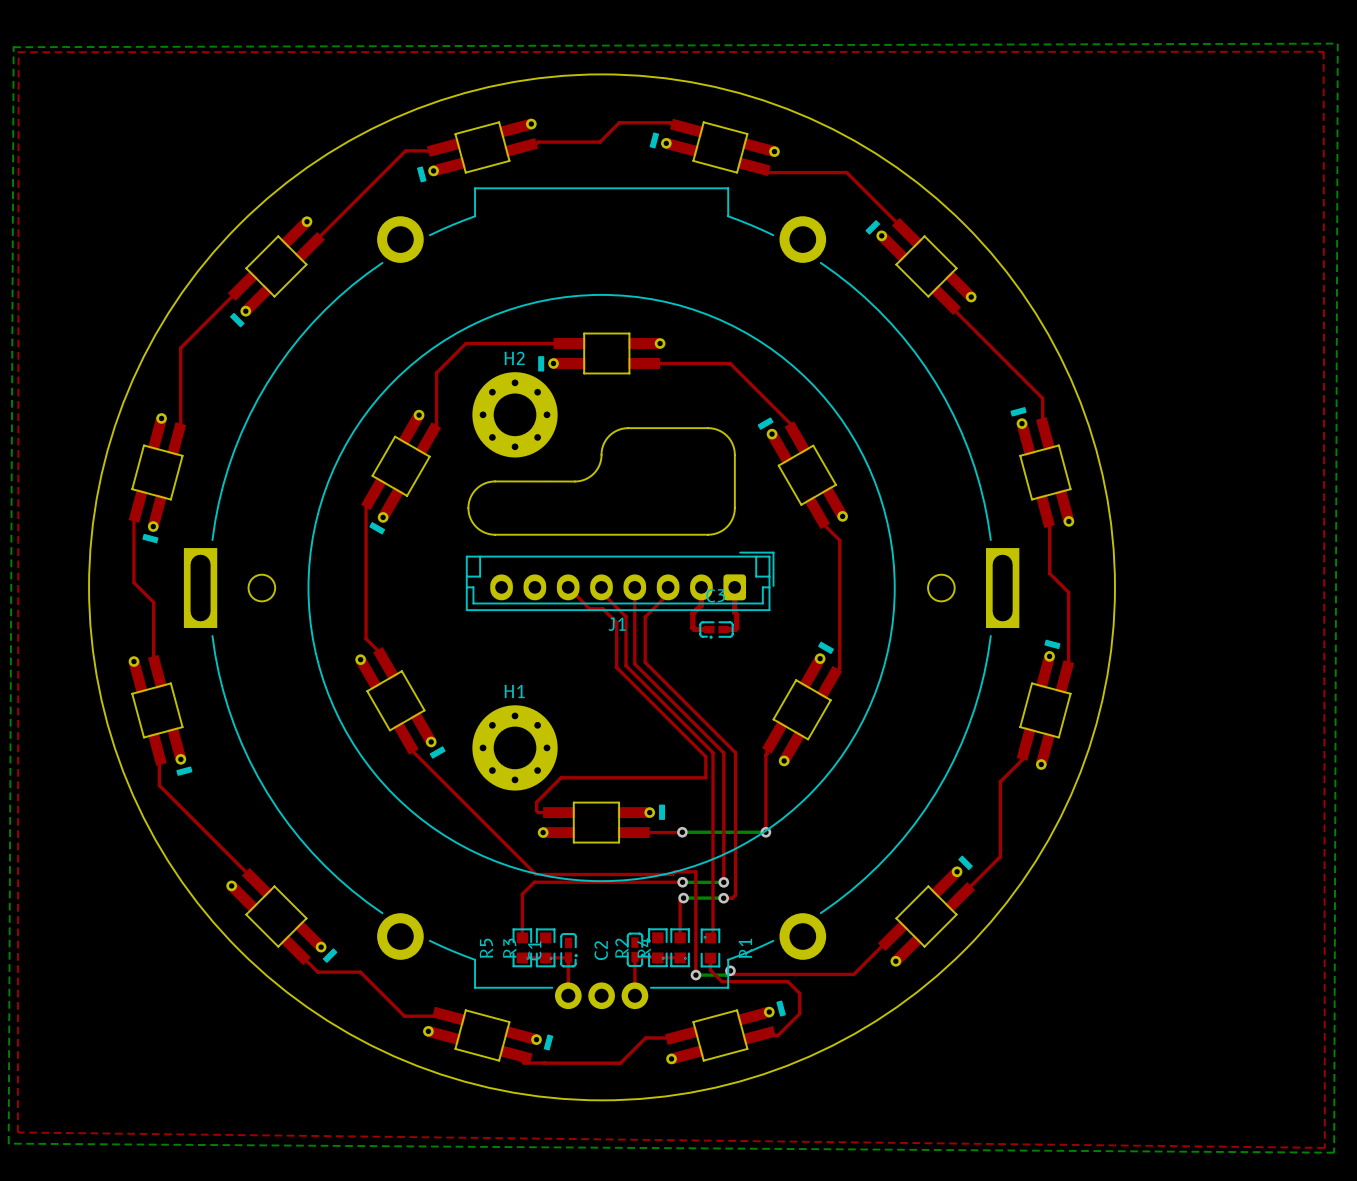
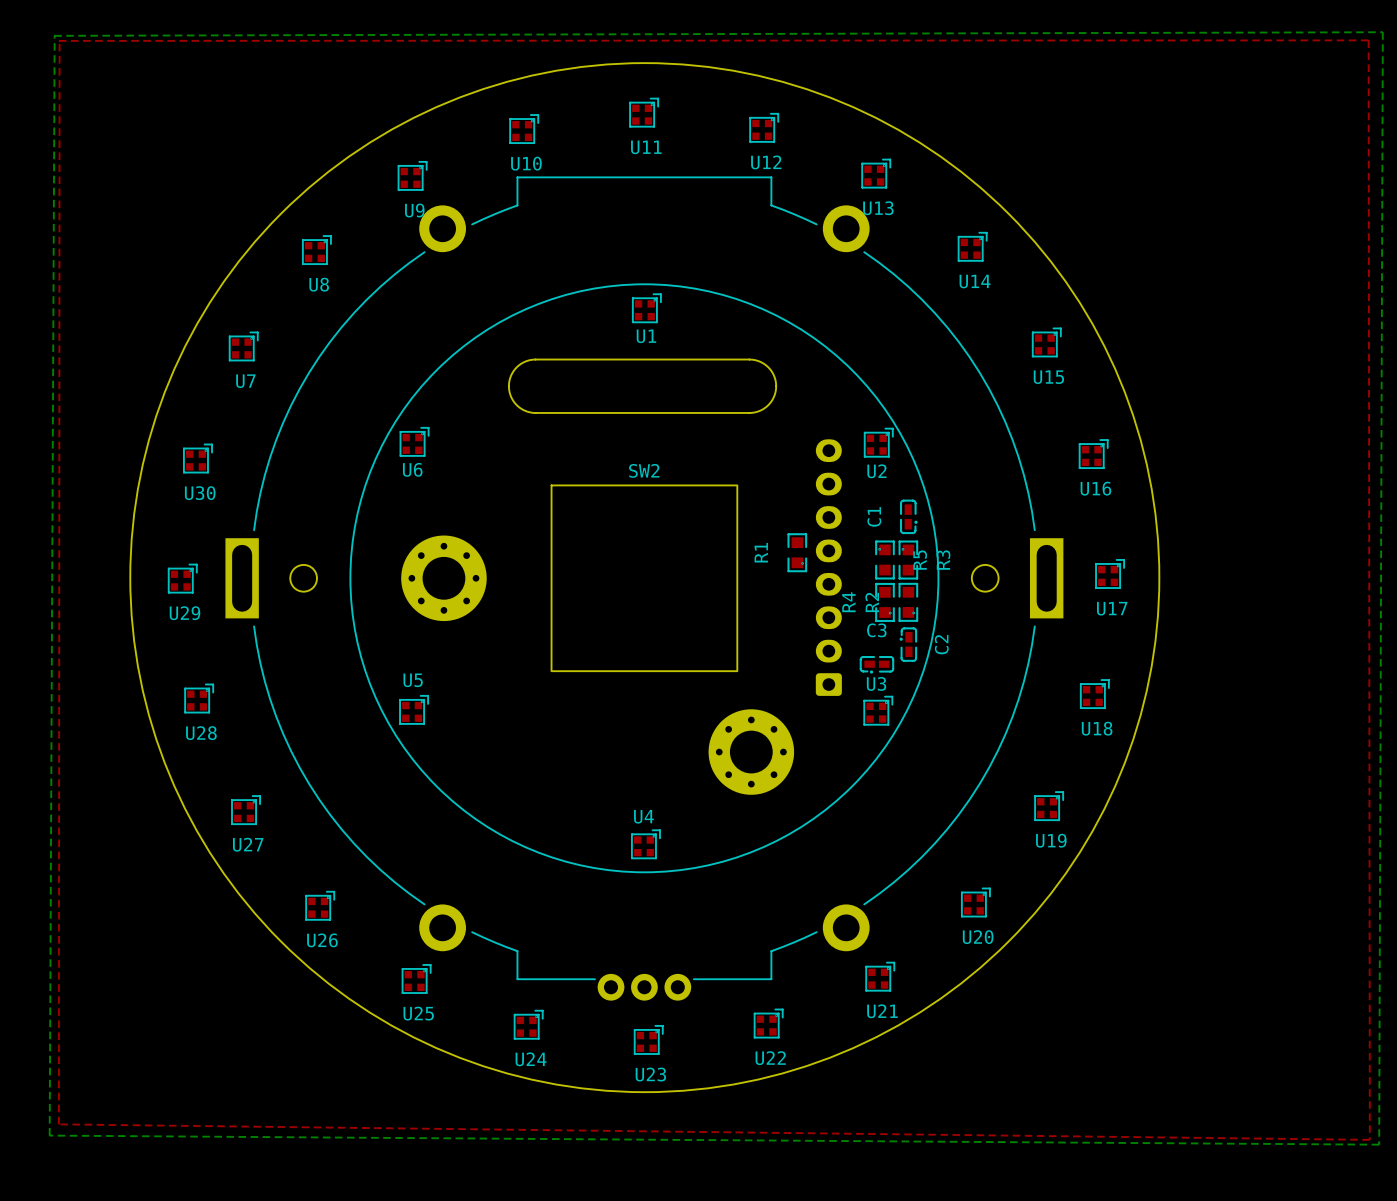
U11: none -> (644, 112)
top track: (686, 128) (675, 128) (670, 122) (619, 122) (600, 142) (538, 142) (532, 147) (521, 147) -> none
U12: none -> (764, 127)
U10: none -> (524, 129)
top track: (443, 147) (440, 150) (405, 150) (309, 247) -> none
part: (714, 147) -> none
part: (477, 150) -> none
top track: (753, 166) (763, 166) (768, 172) (846, 172) (907, 232) -> none
U13: none -> (876, 173)
U9: none -> (412, 175)
U14: none -> (972, 246)
U8: none -> (316, 250)
part: (921, 266) -> none
part: (276, 271) -> none
top track: (242, 285) (180, 347) (180, 435) (176, 439) -> none
top track: (945, 299) (1042, 398) (1042, 431) (1045, 433) -> none
U1: none -> (646, 308)
top track: (569, 343) (466, 343) (436, 372) (436, 430) (428, 438) -> none
U15: none -> (1046, 342)
part: (601, 353) -> none
U7: none -> (243, 346)
top track: (644, 363) (730, 363) (797, 430) (797, 437) -> none
board edge: none -> (535, 359) (752, 359) (761, 362) (770, 369) (774, 377) (776, 389) (768, 405) (752, 412) (532, 412) (524, 410) (514, 402) (510, 395) (509, 383) (513, 372) (518, 365) (535, 359)
H2: (515, 414) -> none
U6: none -> (414, 441)
U2: none -> (878, 442)
board edge: (601, 454) (602, 446) (607, 438) (613, 432) (622, 428) (708, 428) (719, 430) (730, 440) (734, 451) (734, 508) (732, 519) (722, 530) (711, 534) (495, 534) (480, 530) (471, 519) (468, 511) (469, 499) (474, 491) (483, 484) (495, 481) (580, 480) (595, 471) (601, 454) -> none
U16: none -> (1093, 454)
part: (1042, 467) -> none
U30: none -> (197, 458)
part: (401, 472) -> none
part: (802, 473) -> none
part: (157, 478) -> none
top track: (373, 493) (366, 501) (366, 638) (385, 658) (385, 663) -> none
top track: (138, 505) (133, 510) (133, 582) (153, 602) (153, 668) (157, 671) -> none
top track: (1045, 511) (1045, 522) (1049, 526) (1049, 573) (1068, 592) (1068, 673) (1064, 677) -> none
top track: (817, 512) (817, 517) (839, 540) (839, 668) (829, 678) (829, 682) -> none
J1 side: top (620, 581) -> bottom (828, 567)
U17: none -> (1110, 573)
top track: (568, 587) (589, 608) (602, 608) (616, 622) (616, 667) (705, 756) (705, 777) (561, 777) (536, 802) (538, 812) (559, 812) -> none
top track: (601, 587) (601, 592) (626, 616) (626, 665) (713, 752) (713, 935) (710, 937) -> none
top track: (634, 587) (634, 663) (723, 752) (723, 882) -> none
top track: (668, 587) (668, 594) (645, 617) (645, 662) (735, 752) (735, 895) (732, 898) (723, 898) -> none
top track: (701, 587) (701, 604) (692, 613) (692, 627) (694, 629) (709, 629) -> none
top track: (734, 587) (736, 627) (734, 629) (723, 629) -> none
U29: none -> (182, 578)
part: none -> (443, 578)
SW2: none -> (644, 578)
C3 position: (716, 630) -> (876, 664)
part: (400, 702) -> none
part: (802, 703) -> none
U18: none -> (1094, 694)
part: (1045, 704) -> none
U28: none -> (199, 698)
part: (160, 715) -> none
U5: none -> (414, 709)
U3: none -> (878, 710)
top track: (774, 737) (766, 744) (765, 755) (765, 832) -> none
top track: (405, 738) (405, 744) (535, 874) (672, 874) (675, 871) (695, 871) (695, 974) -> none
top track: (1026, 743) (1026, 756) (1000, 781) (1000, 856) (959, 897) -> none
H1: (515, 747) -> none
top track: (157, 749) (159, 751) (159, 785) (256, 883) -> none
part: none -> (751, 752)
U19: none -> (1049, 806)
U27: none -> (246, 810)
part: (601, 822) -> none
top track: (682, 832) (633, 832) -> none
bottom track: (682, 832) (765, 832) -> none
via: (682, 832) -> none
via: (765, 832) -> none
U4: none -> (645, 844)
top track: (682, 882) (534, 882) (522, 894) (522, 937) -> none
bottom track: (682, 882) (723, 882) -> none
via: (682, 882) -> none
via: (723, 882) -> none
top track: (683, 898) (680, 901) (680, 937) -> none
bottom track: (683, 898) (723, 898) -> none
via: (683, 898) -> none
via: (723, 898) -> none
part: (926, 911) -> none
U20: none -> (975, 902)
U26: none -> (320, 905)
part: (281, 916) -> none
top track: (893, 935) (853, 974) (734, 974) (730, 970) -> none
R5 rotation: 0° (522, 947) -> 180° (884, 559)
R5 position: (522, 947) -> (884, 559)
R3 rotation: 0° (545, 947) -> 180° (908, 560)
R3 position: (545, 947) -> (908, 560)
R2 position: (657, 947) -> (908, 602)
R4 position: (680, 947) -> (884, 602)
R1 rotation: 0° (710, 948) -> 180° (797, 552)
R1 position: (710, 948) -> (797, 552)
top track: (295, 949) (317, 972) (360, 972) (404, 1016) (449, 1016) -> none
C2 rotation: 0° (635, 949) -> 180° (908, 644)
C2 position: (635, 949) -> (908, 644)
C1 position: (569, 950) -> (908, 516)
top track: (568, 957) (568, 995) -> none
top track: (680, 957) (634, 957) (634, 995) -> none
top track: (710, 958) (710, 970) (721, 981) (787, 981) (799, 993) (799, 1013) (777, 1035) (759, 1035) -> none
bottom track: (730, 970) (726, 975) (695, 975) -> none
via: (730, 970) -> none
via: (695, 975) -> none
U21: none -> (880, 976)
U25: none -> (416, 978)
U22: none -> (768, 1023)
part: (725, 1032) -> none
U24: none -> (528, 1024)
part: (488, 1035) -> none
top track: (677, 1039) (675, 1037) (645, 1037) (620, 1063) (544, 1063) -> none
U23: none -> (648, 1039)
top track: (515, 1054) (524, 1063) (544, 1063) -> none

